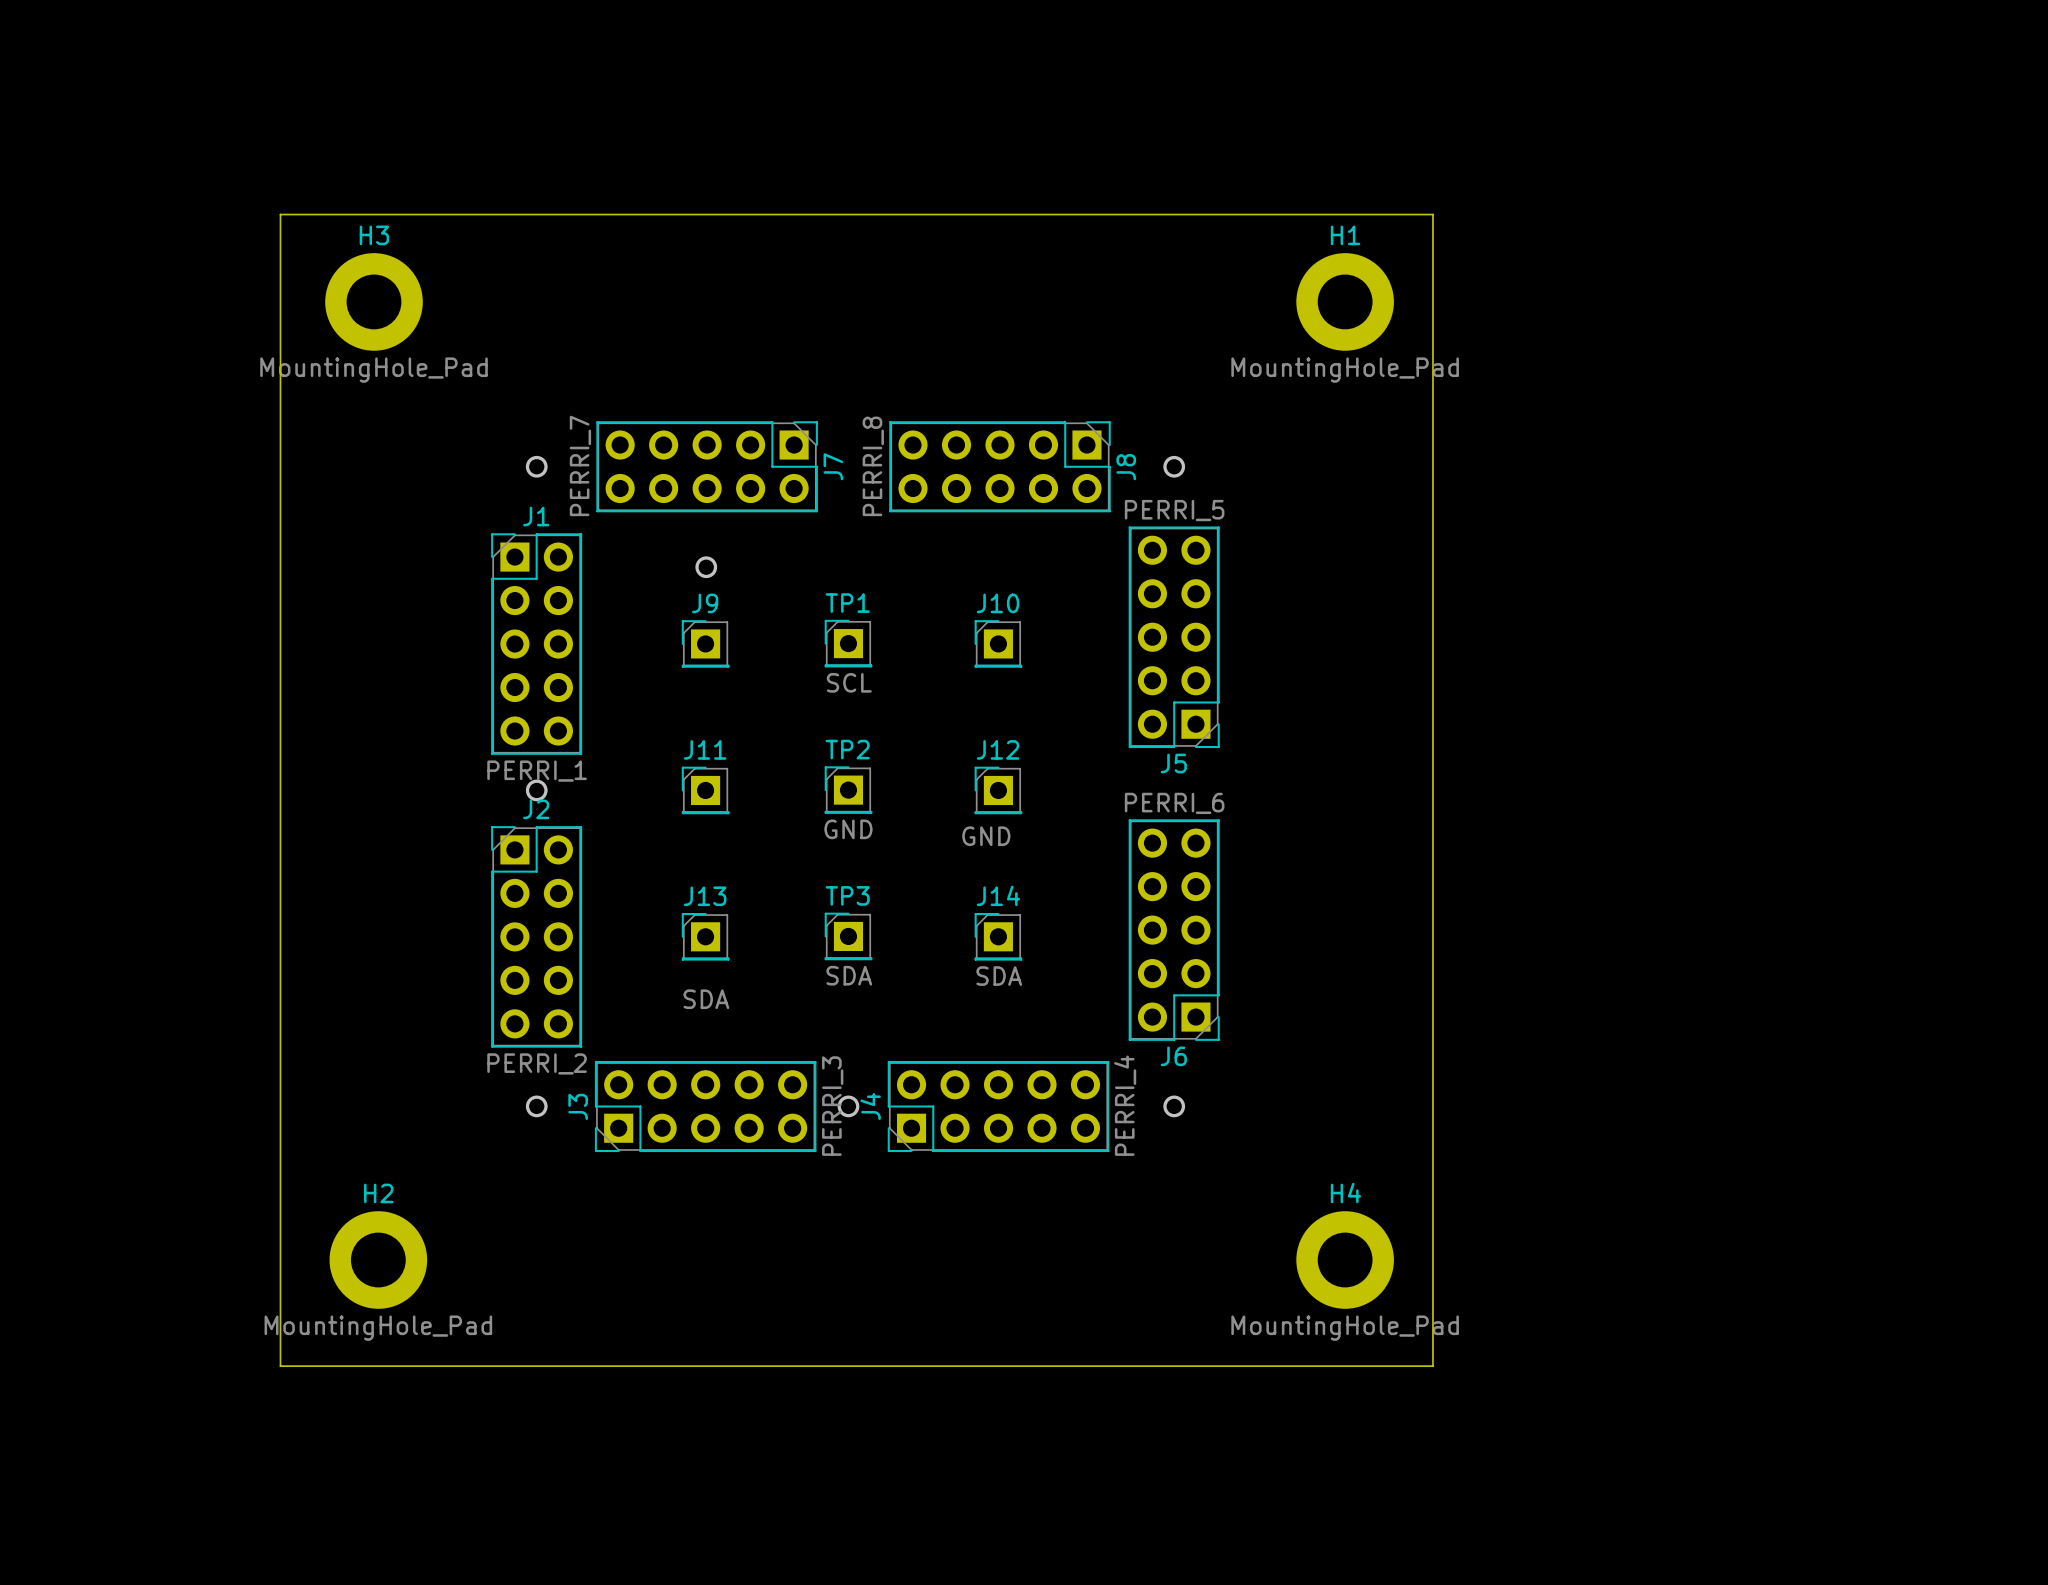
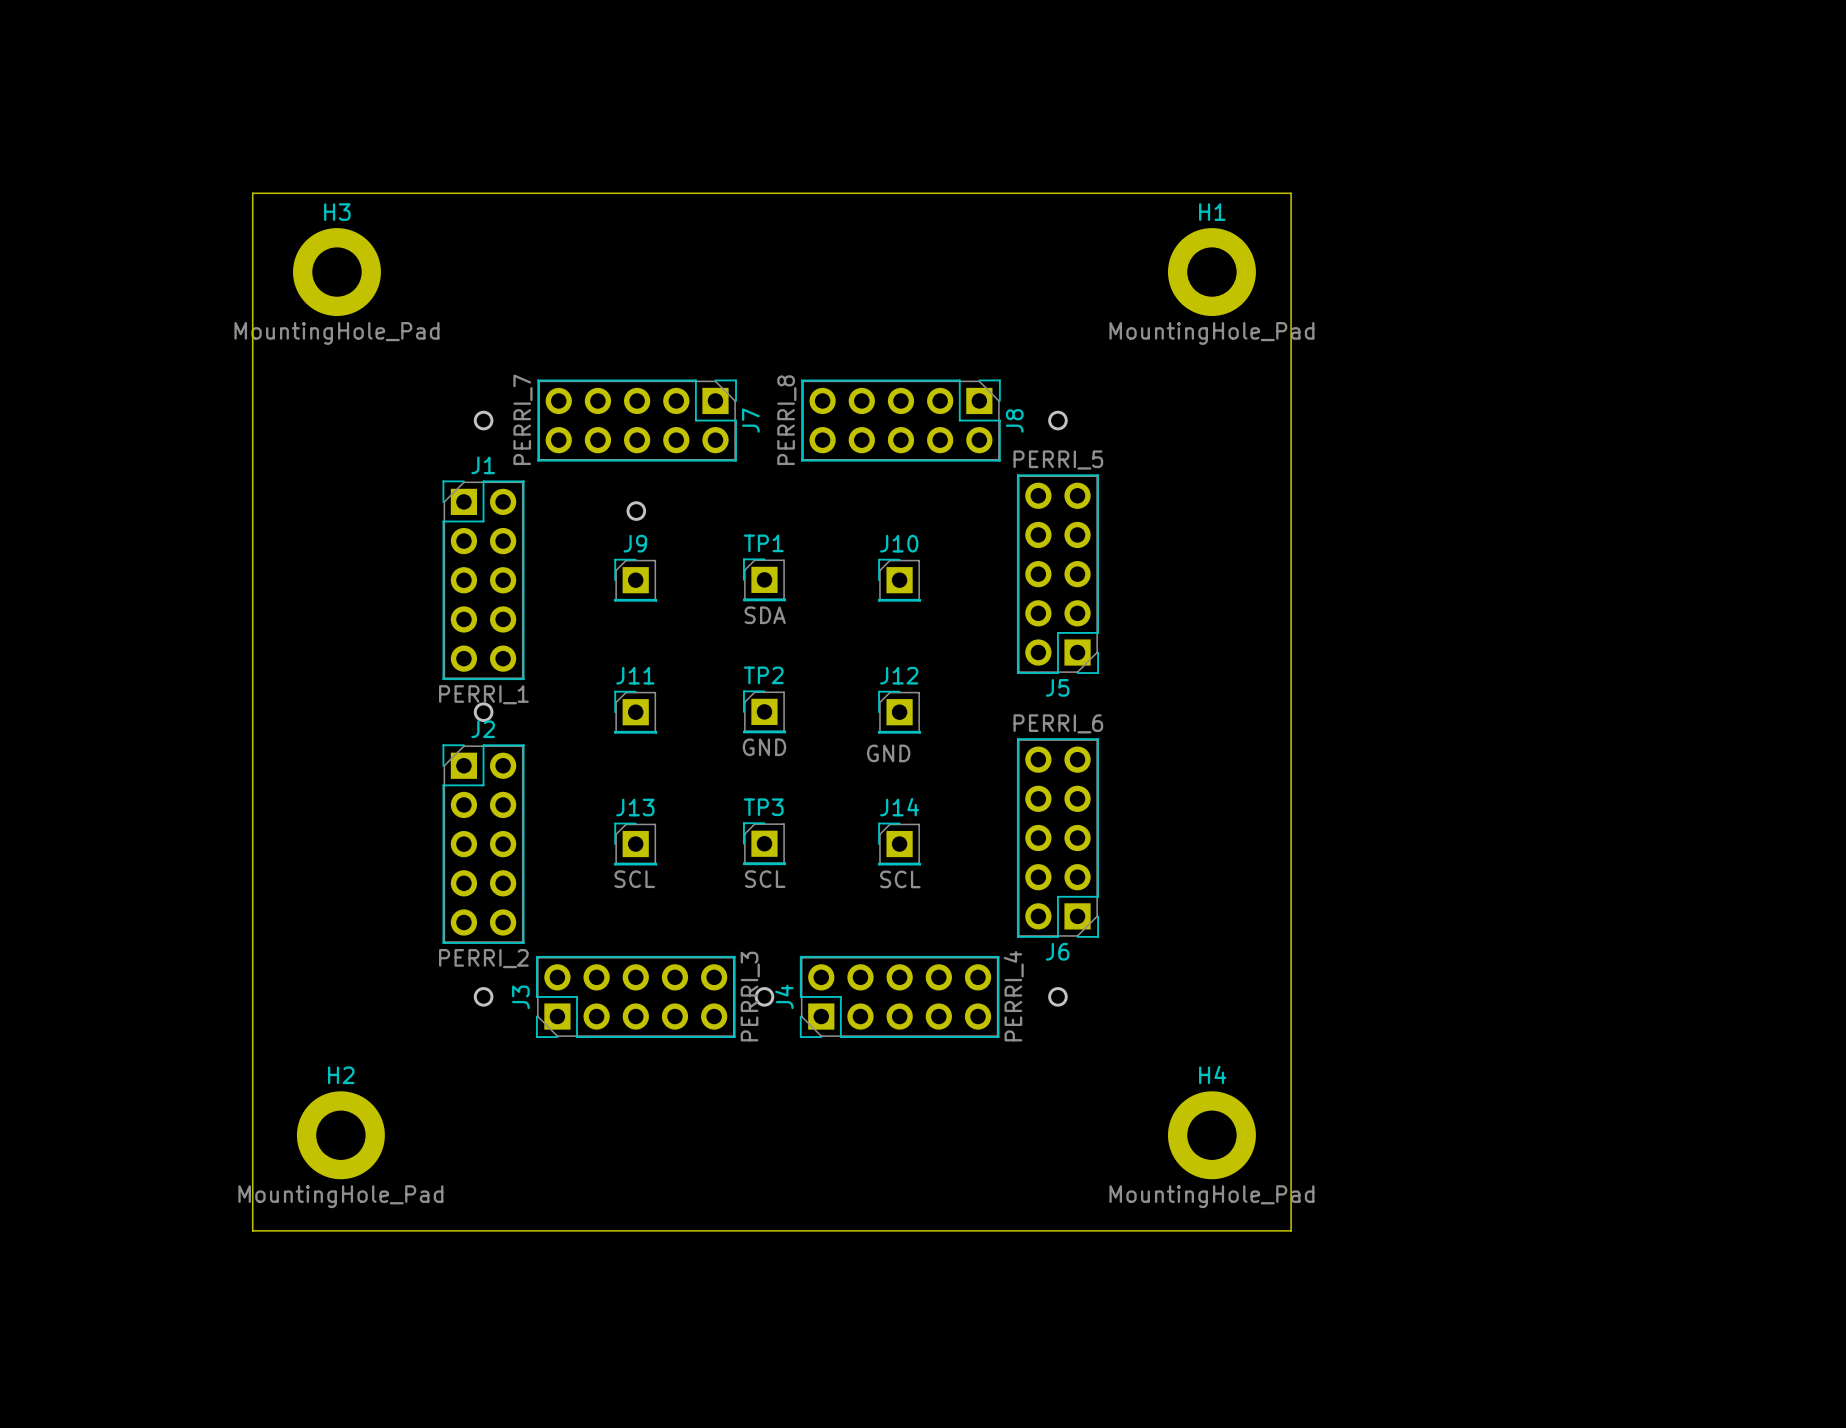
TP1 value: SCL (849, 682) -> SDA (765, 615)
TP3 value: SDA (849, 975) -> SCL (765, 879)
J14 value: SDA (999, 976) -> SCL (900, 879)
J13 value: SDA (706, 999) -> SCL (634, 879)

